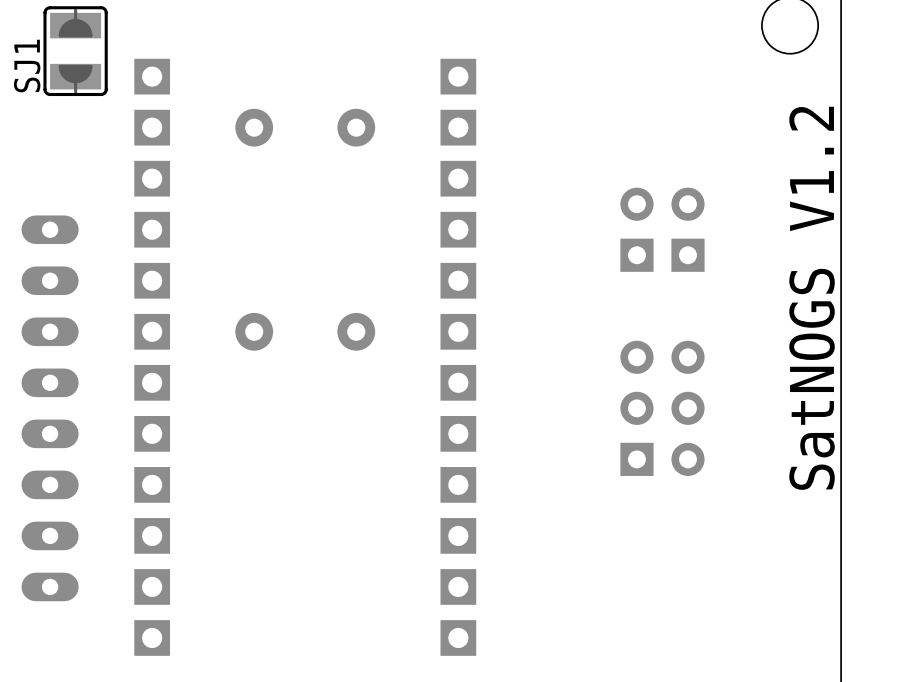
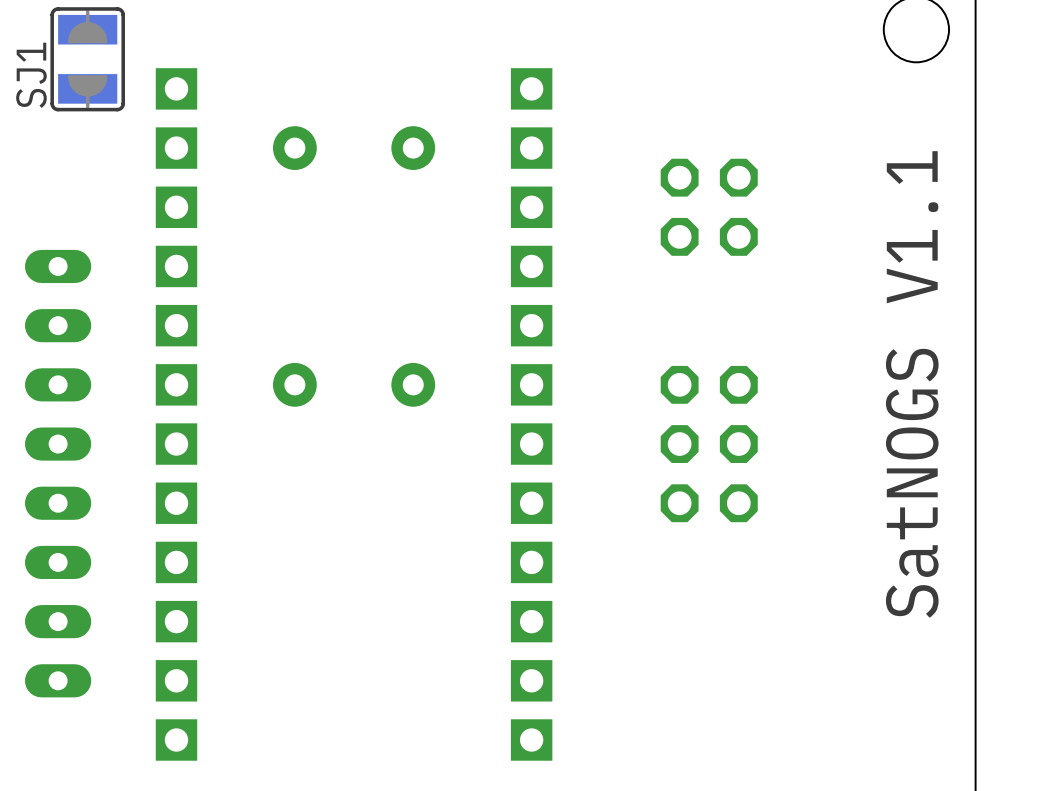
part: none -> (709, 207)
part: (636, 229) -> none
part: (688, 229) -> none
text: SatNOGS V1.2 (812, 298) -> SatNOGS V1.1 (912, 384)
part: none -> (709, 444)
part: (662, 408) -> none

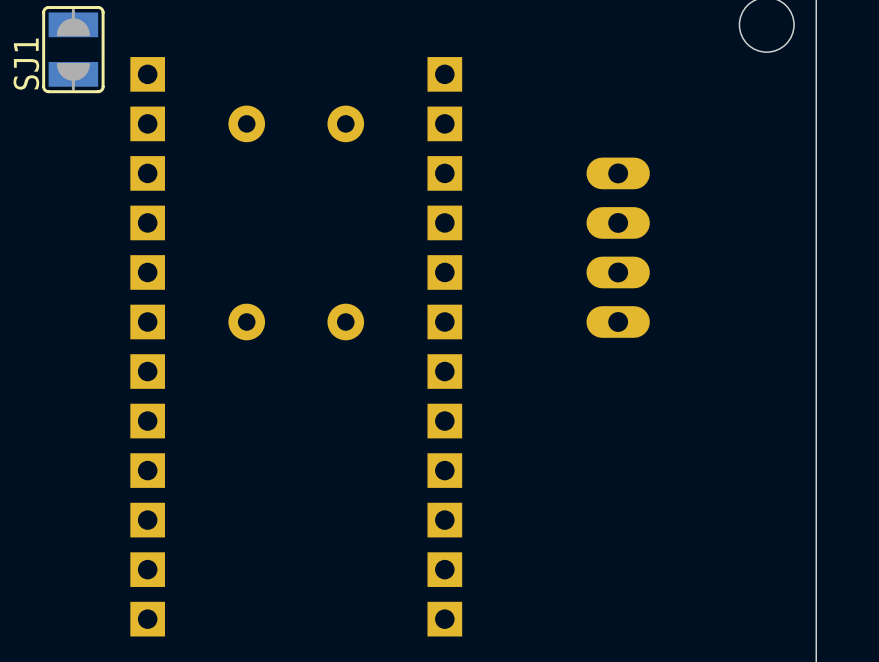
part: (709, 207) -> none
part: none -> (618, 247)
text: SatNOGS V1.1 (912, 384) -> none
part: (709, 444) -> none
part: (58, 473) -> none

